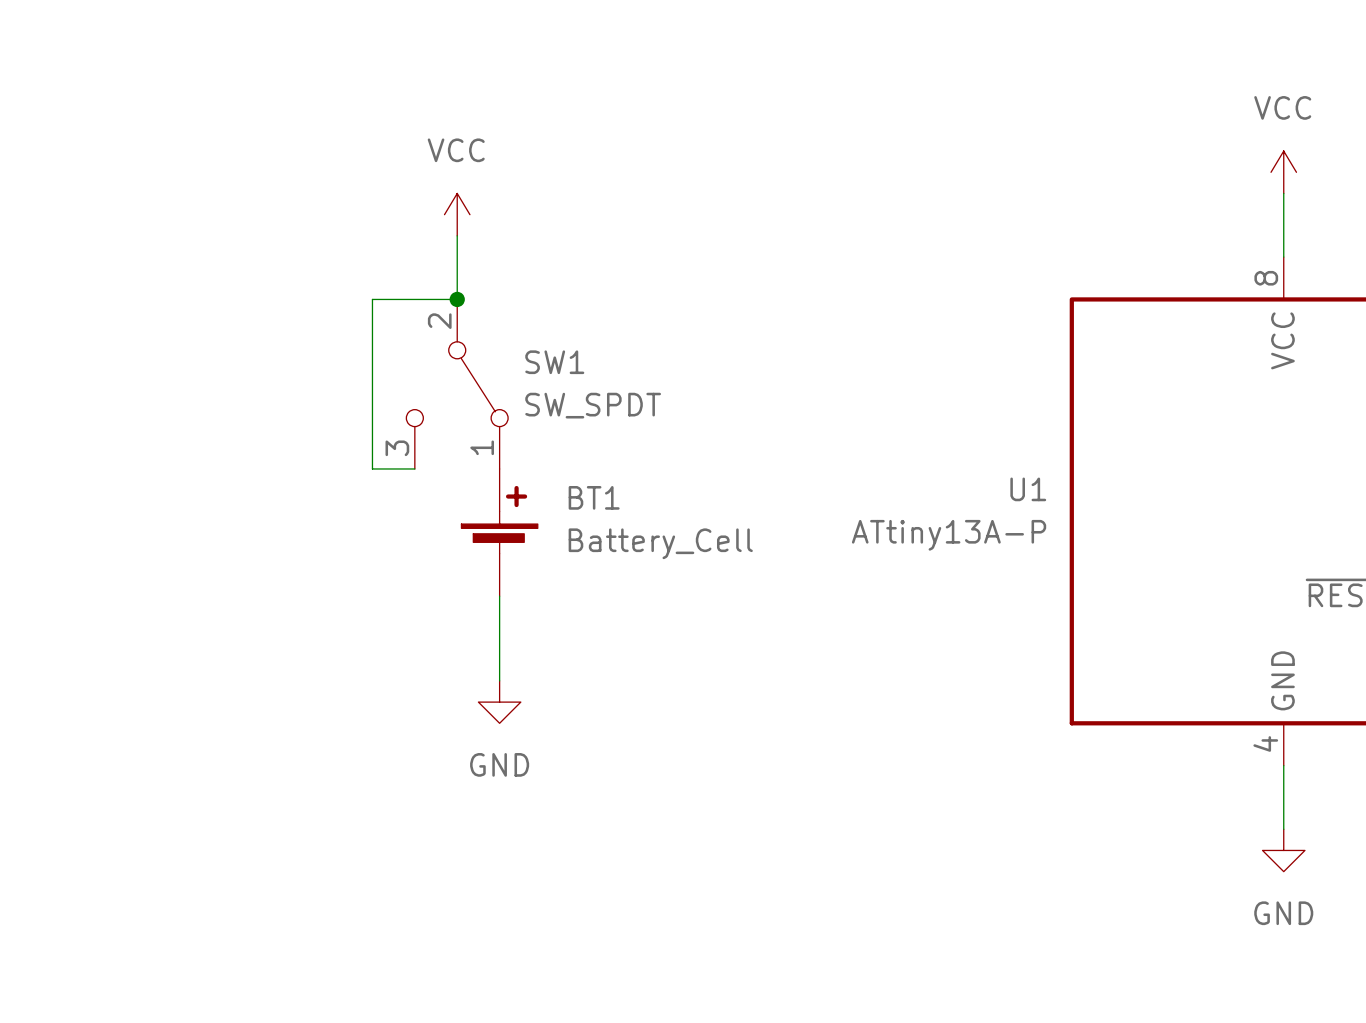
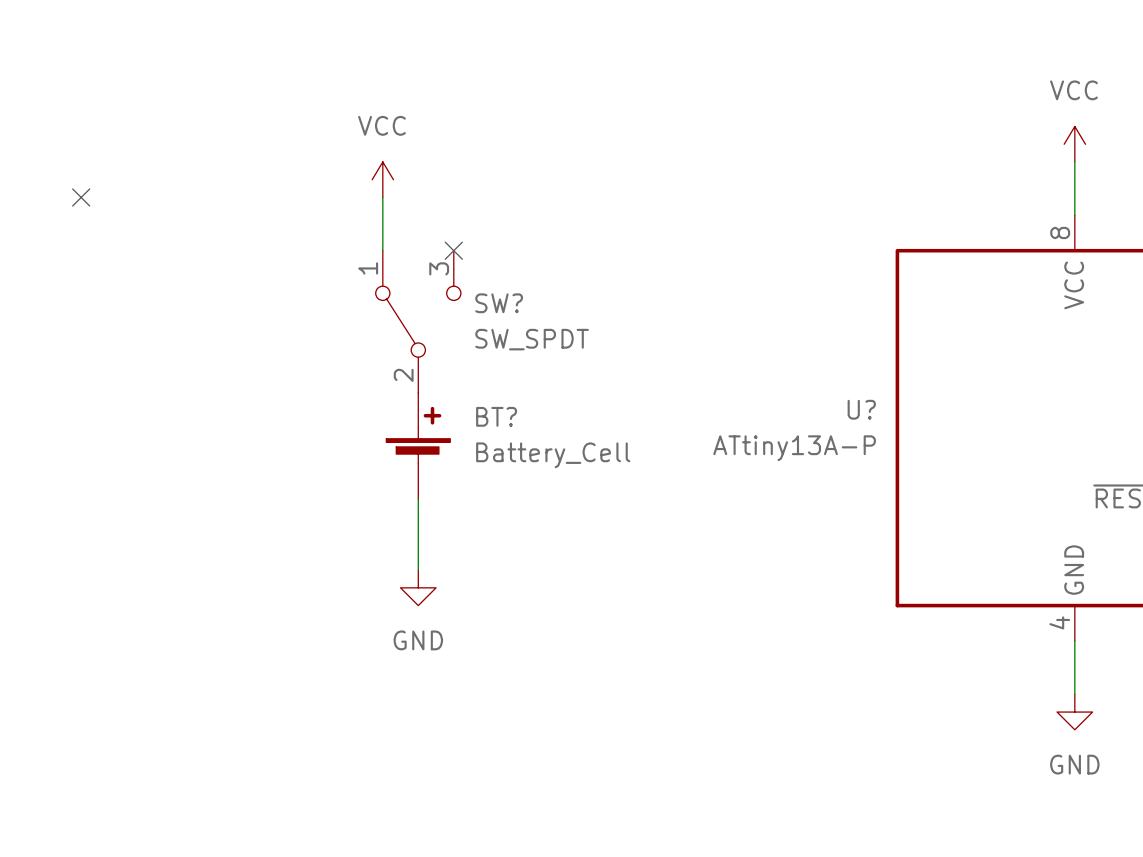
no-connect mark: none -> (81, 197)
wire: (457, 299) (372, 299) (372, 468) (414, 468) -> none
junction: (457, 299) -> none
no-connect mark: none -> (453, 250)
SW1: SW_SPDT (457, 384) -> none
SW?: none -> SW_SPDT (418, 321)
U1 name: U1 (1028, 489) -> U? (861, 409)
BT1 name: BT1 (594, 497) -> BT? (496, 416)

